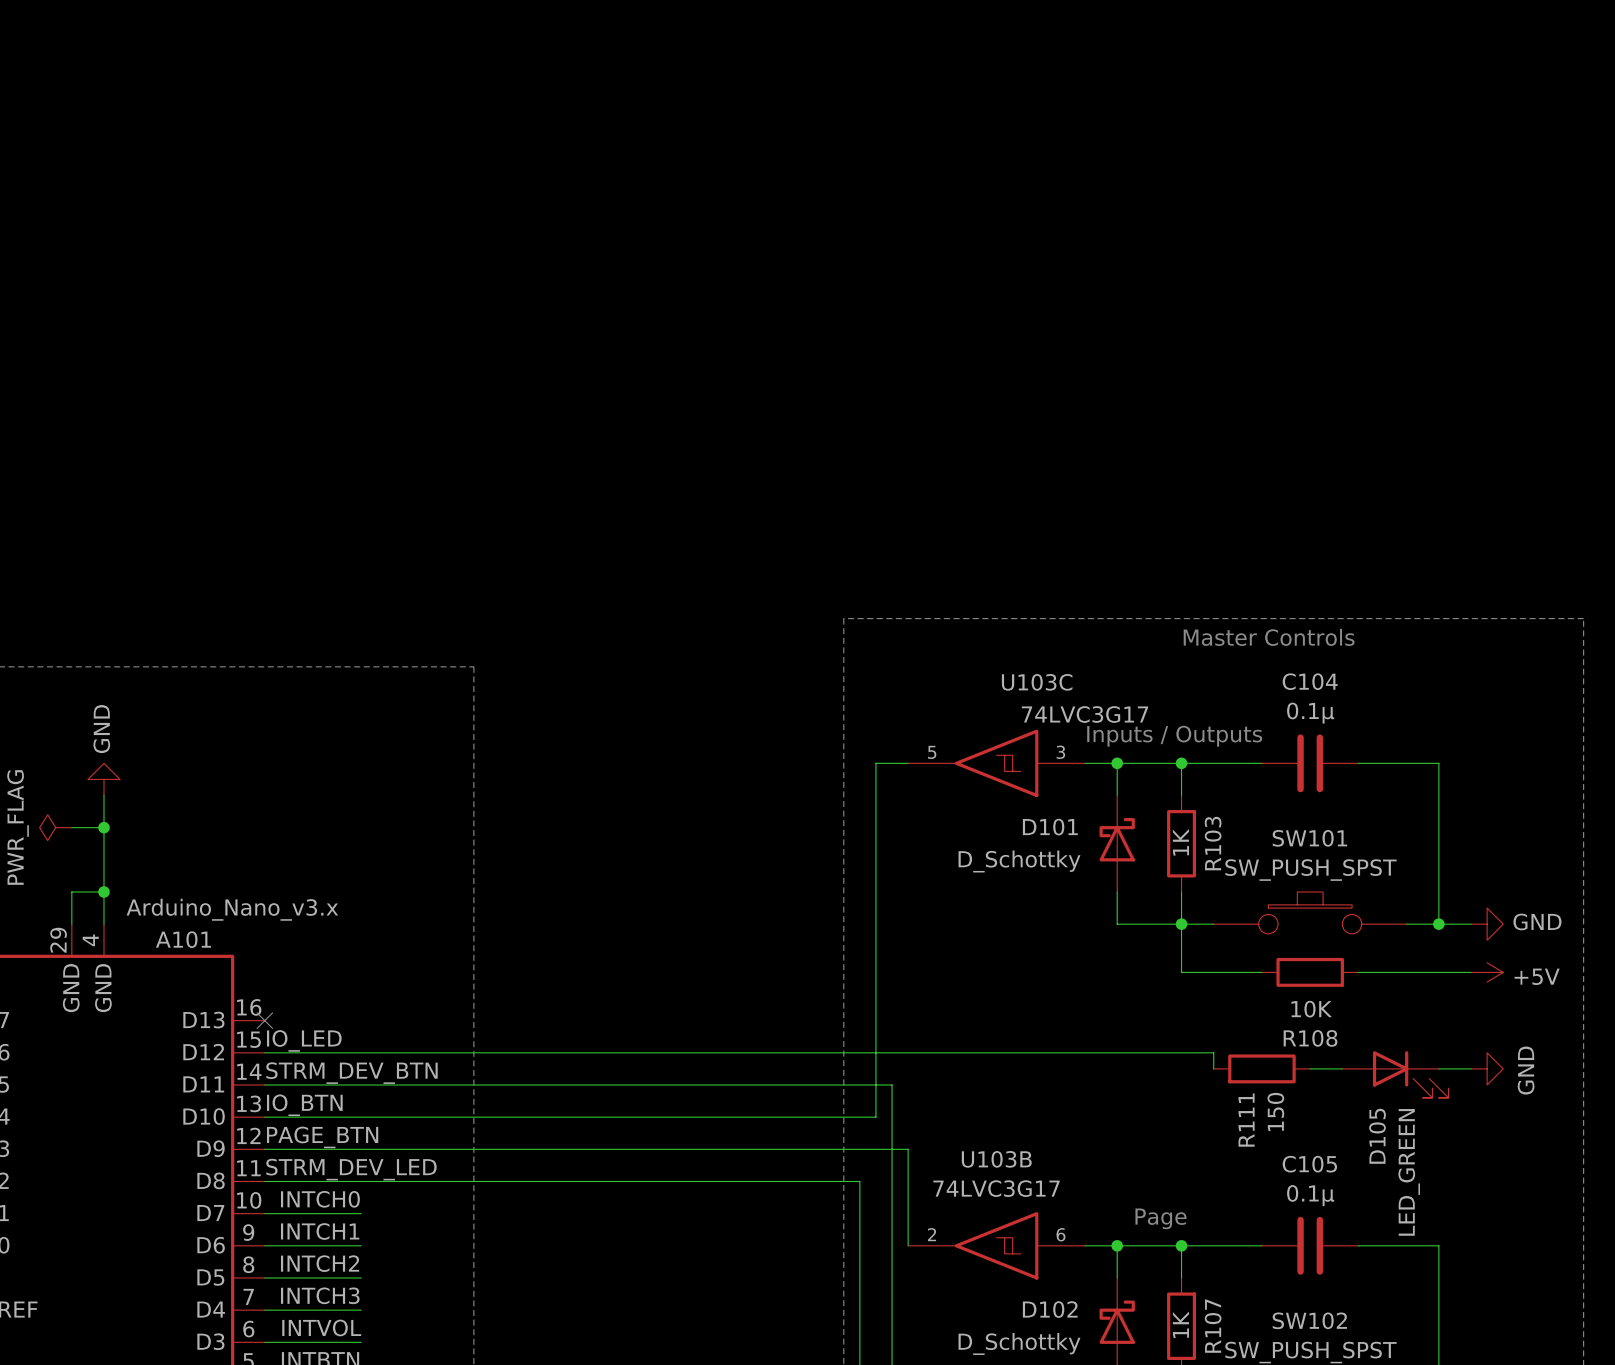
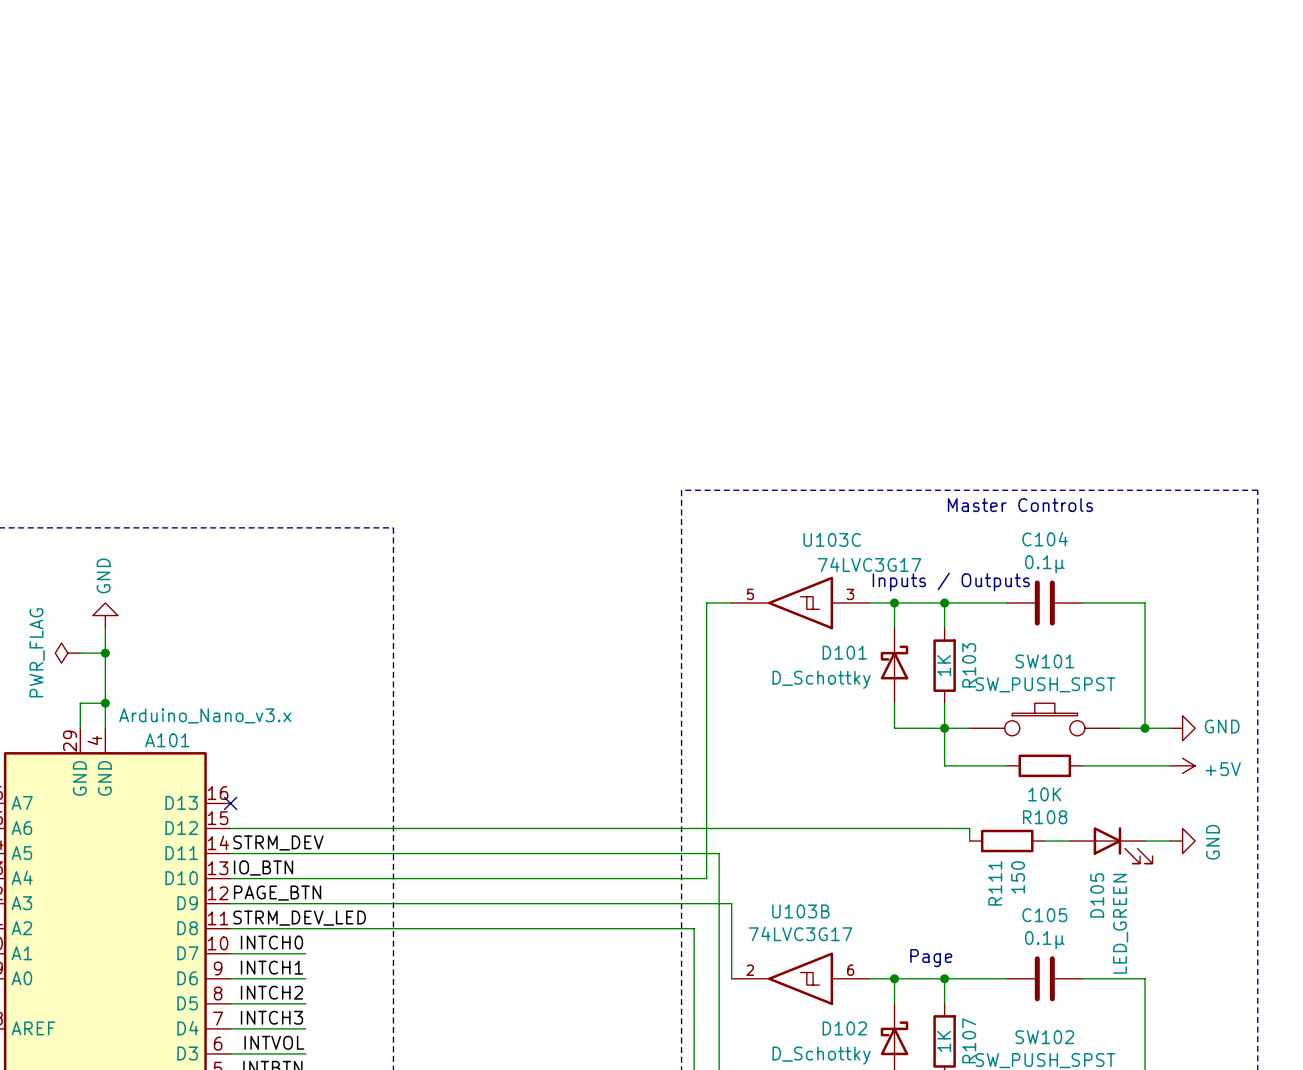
label: IO_LED (304, 1040) -> none
label: STRM_DEV_BTN (351, 1073) -> STRM_DEV (278, 842)

